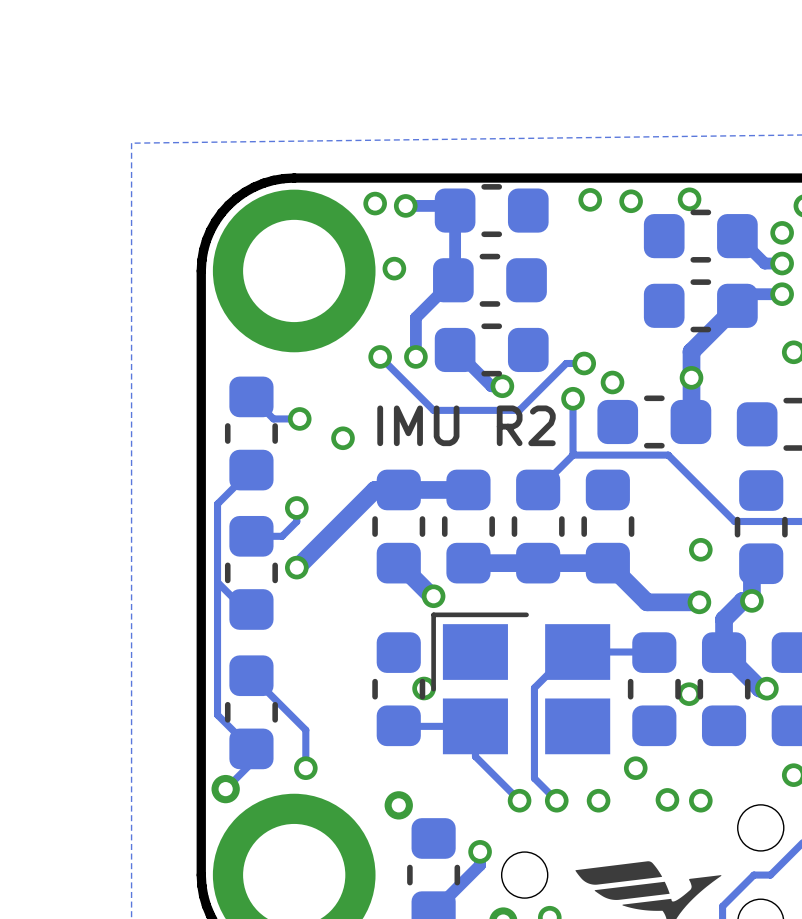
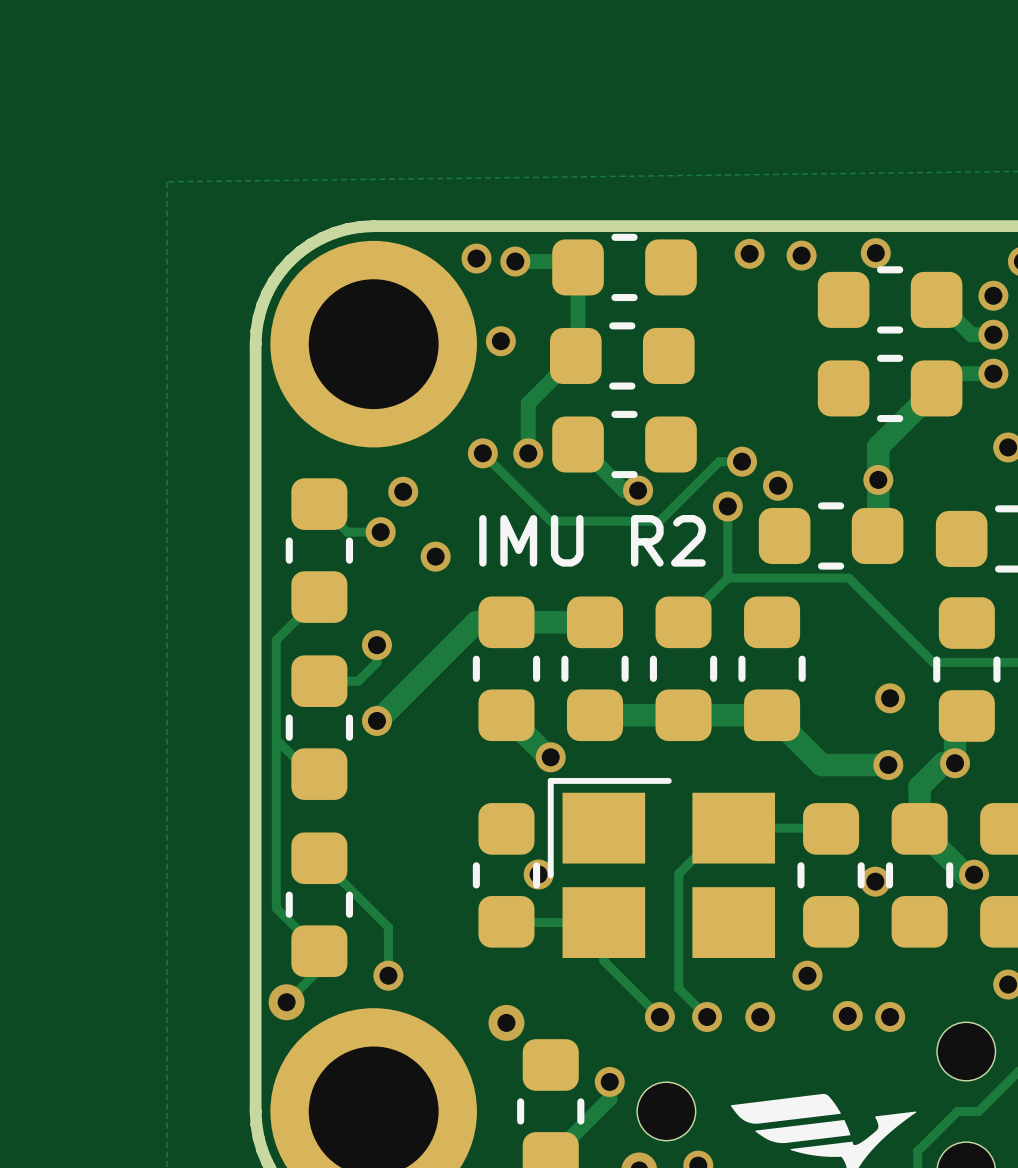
via: none -> (403, 491)

